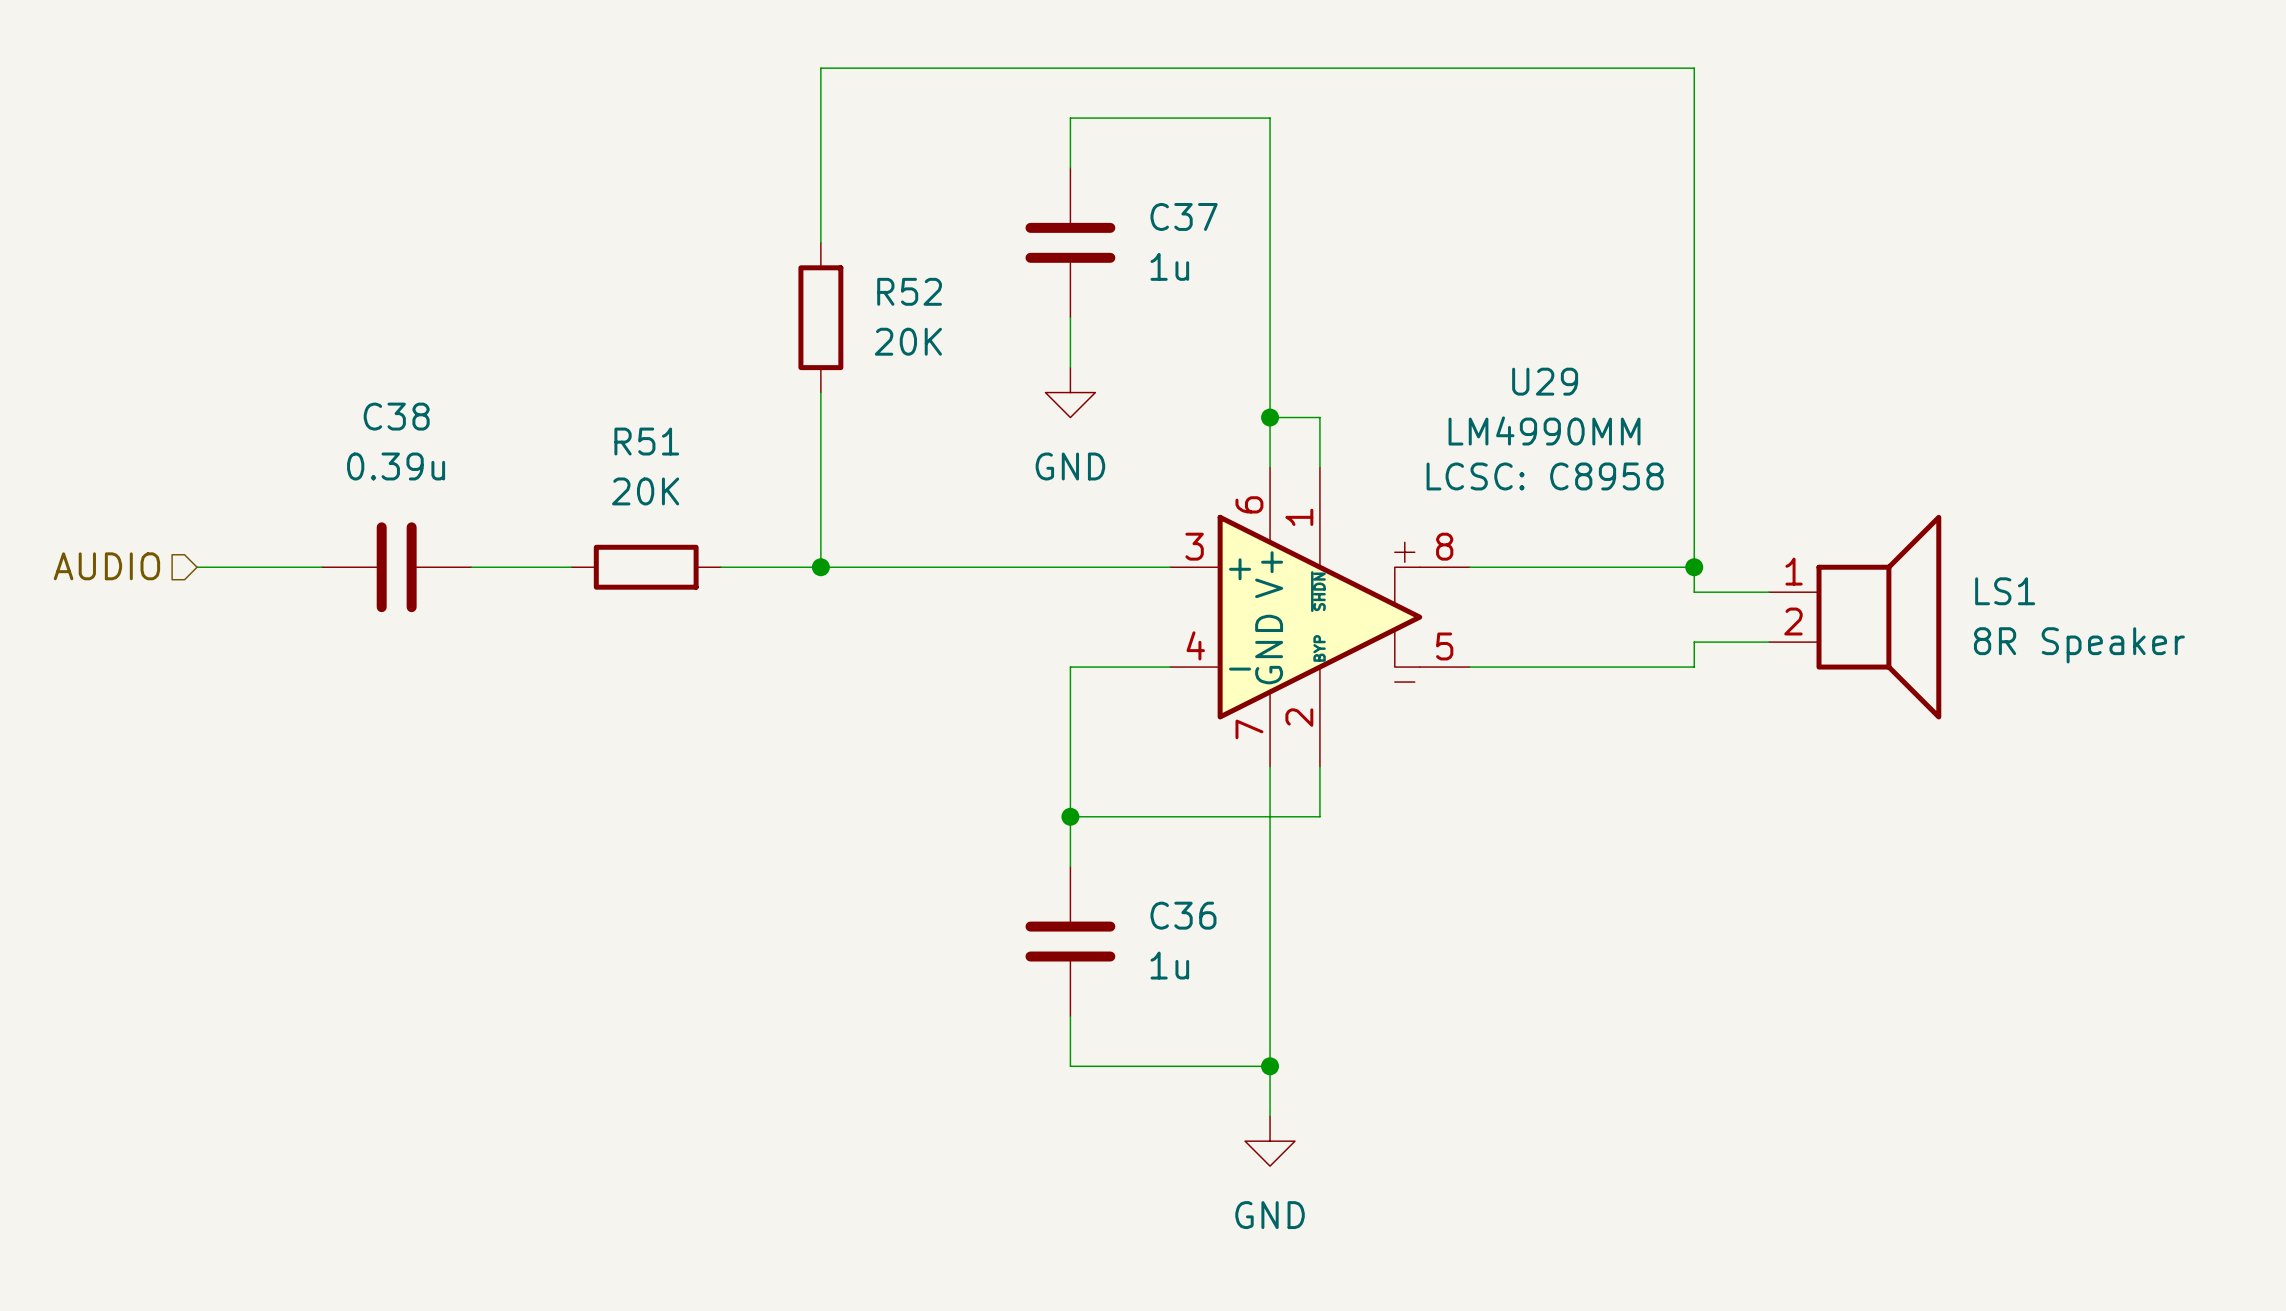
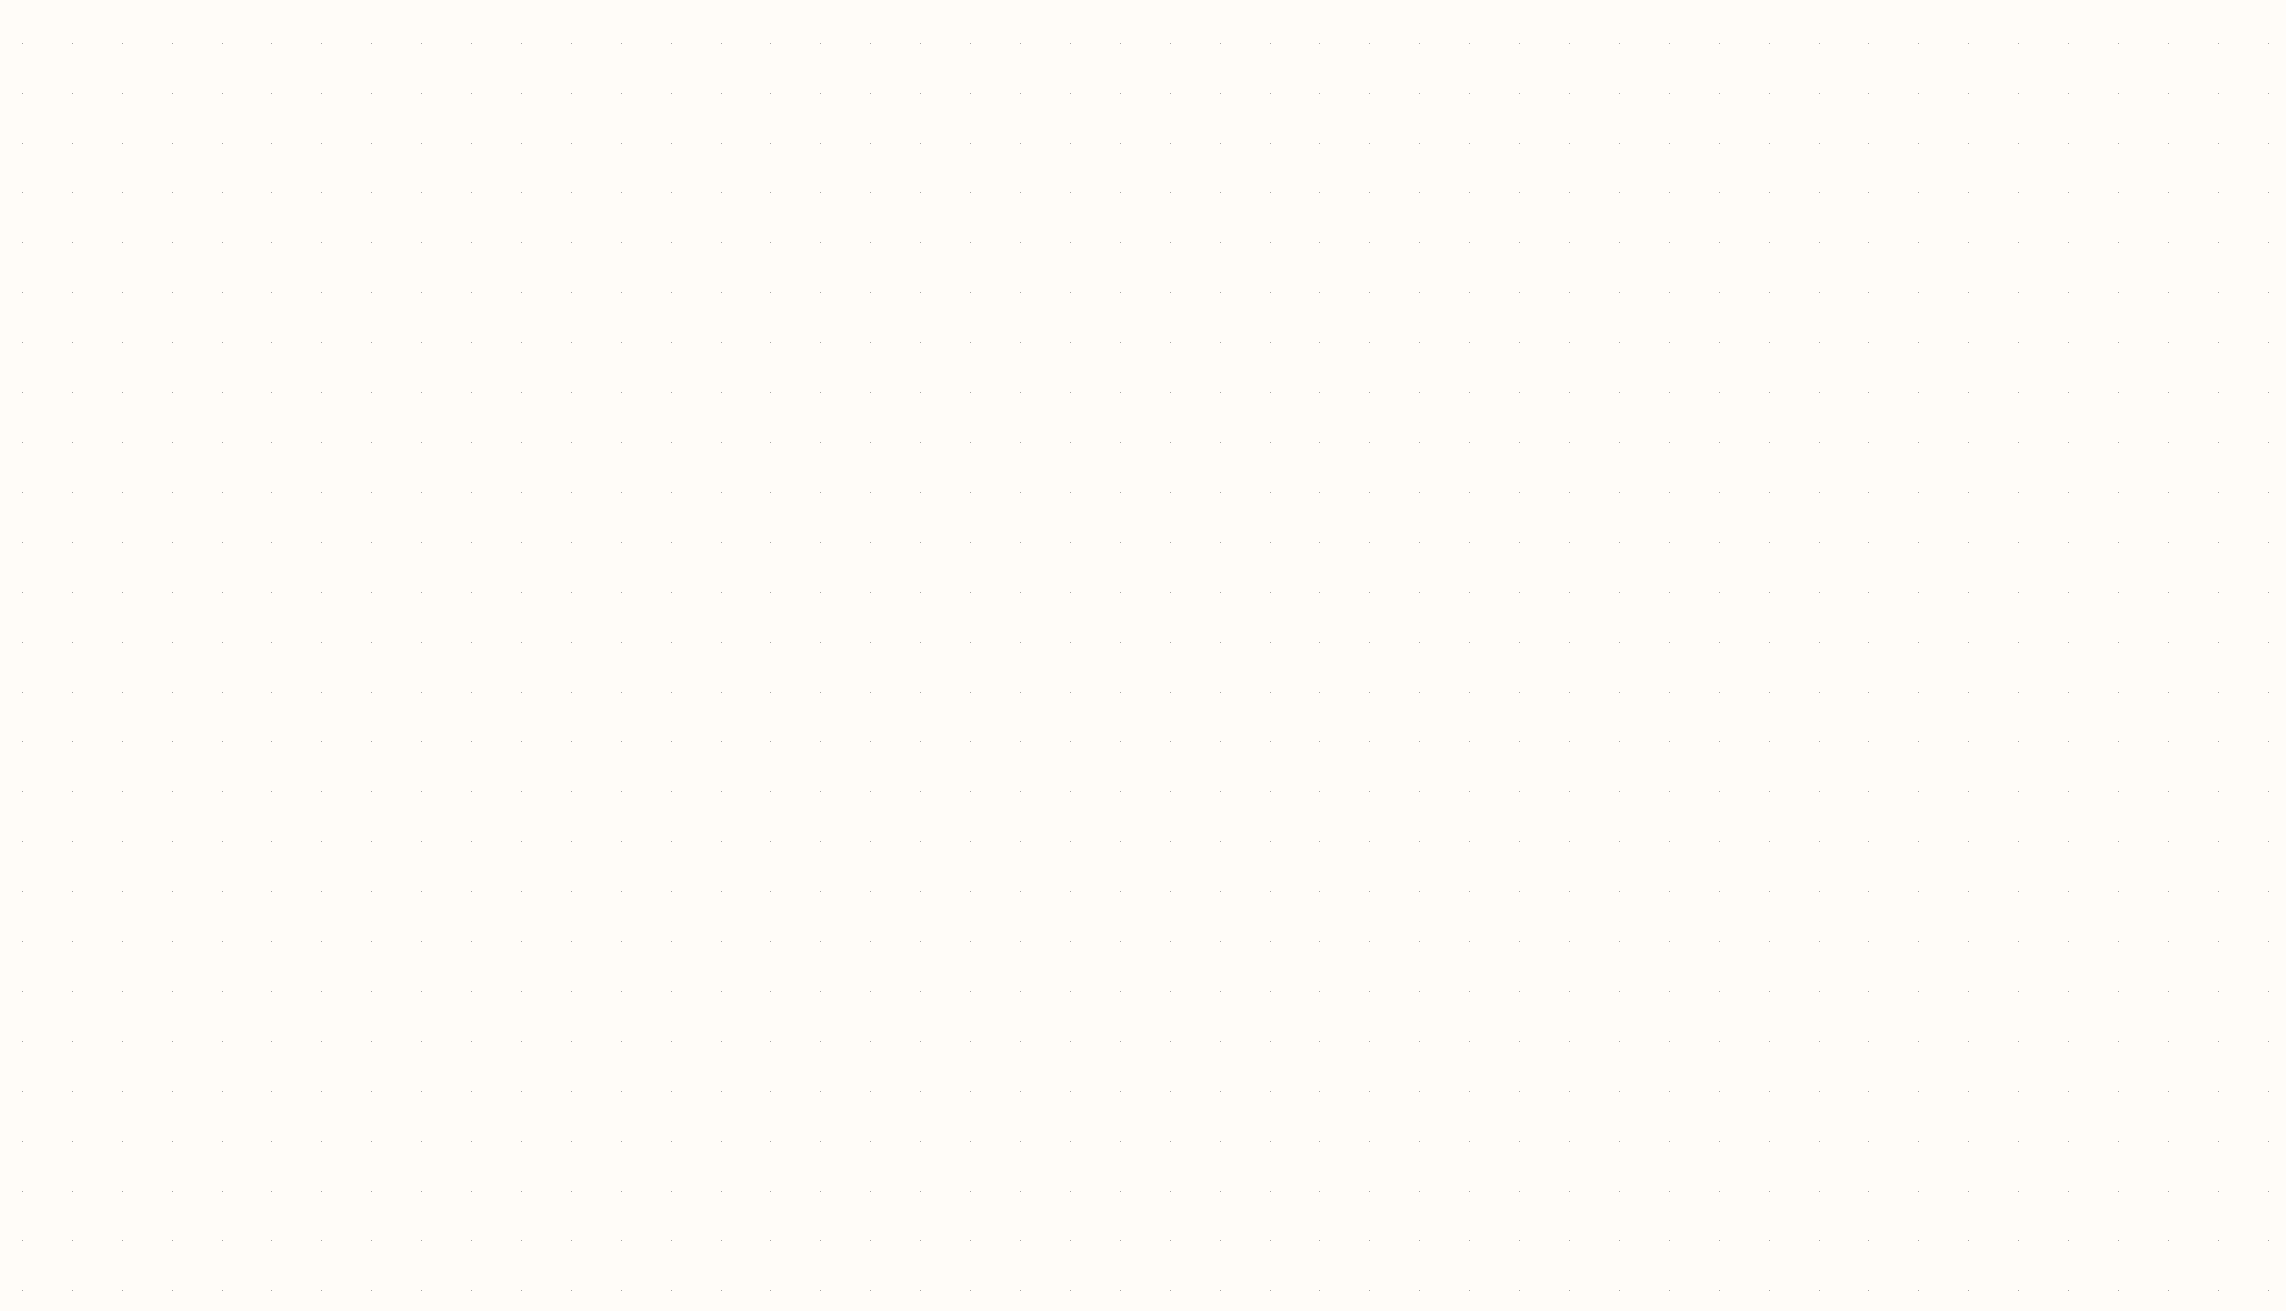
wire: (1070, 167) (1070, 118) (1270, 118) (1270, 467) -> none
wire: (820, 242) (820, 68) (1694, 68) (1694, 592) (1769, 592) -> none
C37: 1u (1070, 242) -> none
R52: 20K (820, 317) -> none
wire: (1070, 317) (1070, 367) -> none
wire: (820, 392) (820, 567) -> none
power symbol: GND (1070, 392) -> none
wire: (1270, 417) (1319, 417) (1319, 467) -> none
junction: (1270, 417) -> none
hierarchical label: AUDIO (106, 566) -> none
wire: (197, 567) (321, 567) -> none
C38: 0.39u (396, 567) -> none
wire: (471, 567) (571, 567) -> none
R51: 20K (646, 567) -> none
wire: (721, 567) (1170, 567) -> none
junction: (820, 567) -> none
wire: (1469, 567) (1694, 567) -> none
junction: (1694, 567) -> none
U29: LM4990MM (1319, 617) -> none
LS1: 8R Speaker (1855, 617) -> none
wire: (1769, 642) (1694, 642) (1694, 667) (1469, 667) -> none
wire: (1170, 667) (1070, 667) (1070, 866) -> none
wire: (1270, 766) (1270, 1116) -> none
wire: (1319, 766) (1319, 816) (1070, 816) -> none
junction: (1070, 816) -> none
C36: 1u (1070, 941) -> none
wire: (1070, 1016) (1070, 1066) (1270, 1066) -> none
junction: (1270, 1066) -> none
power symbol: GND (1270, 1141) -> none

